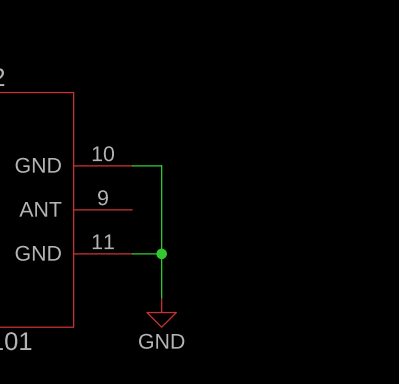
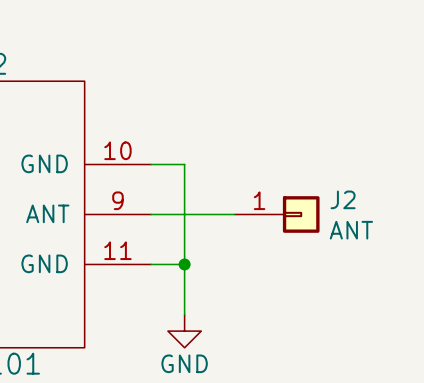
wire: none -> (151, 214) (234, 214)
J2: none -> ANT (277, 214)

